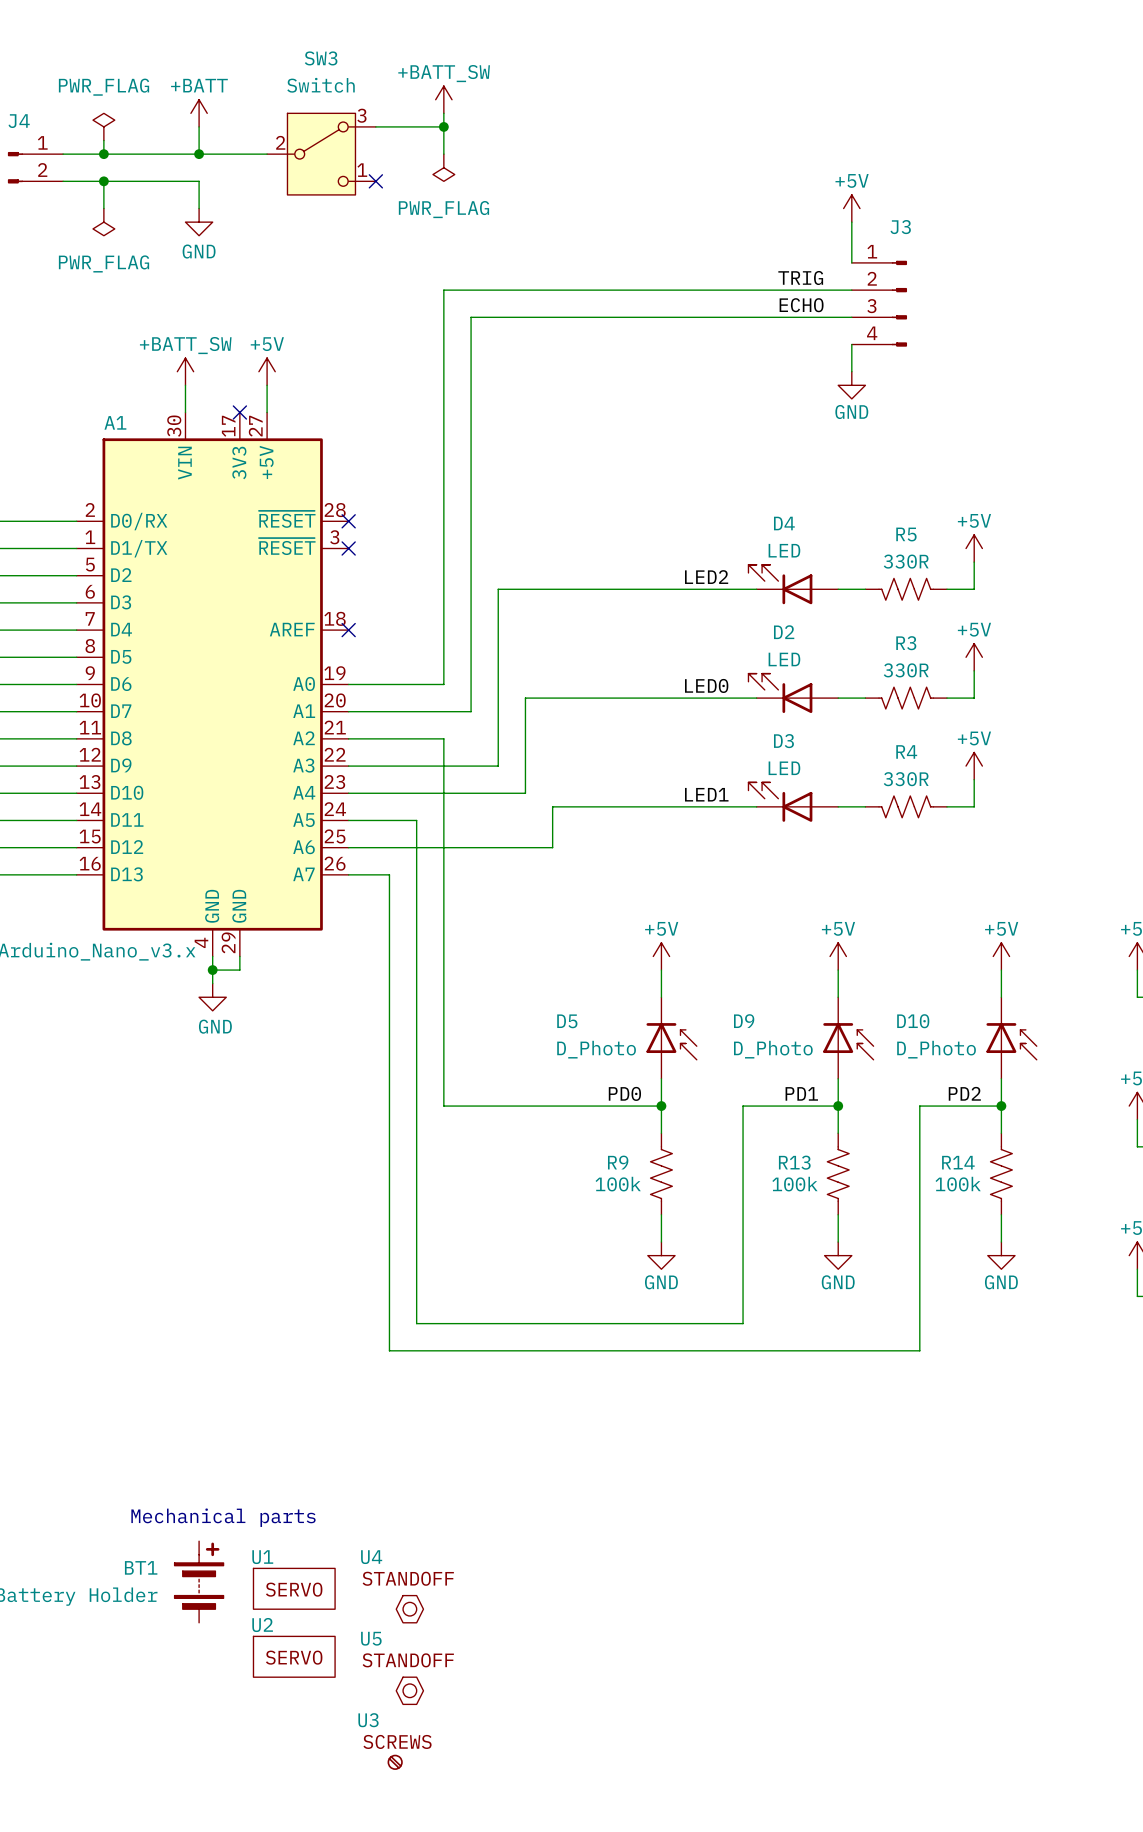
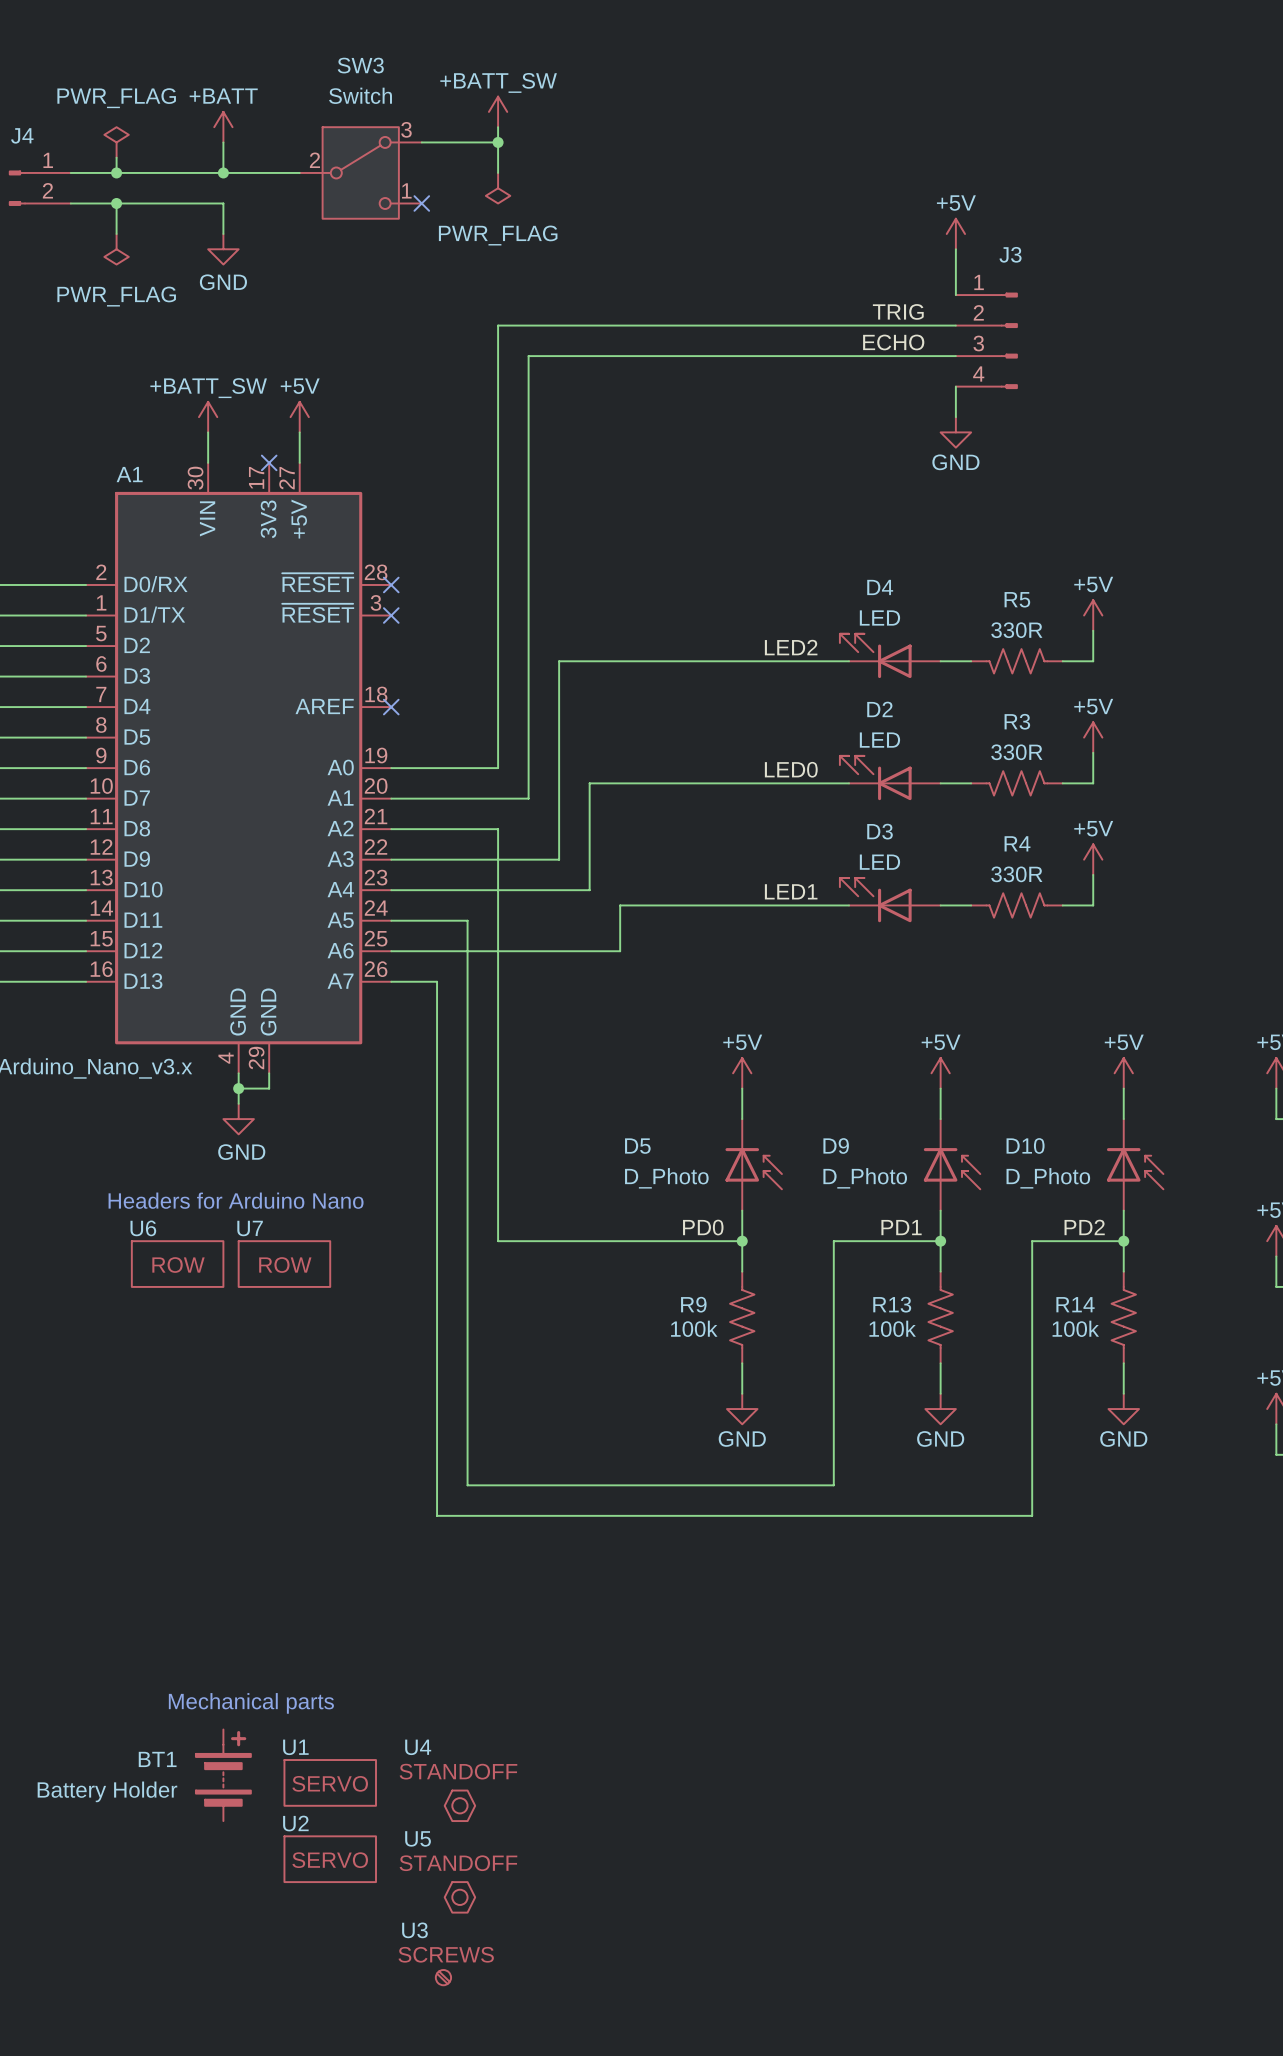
text: none -> Headers for Arduino Nano (236, 1200)
U6: none -> (177, 1264)
U7: none -> (284, 1264)

